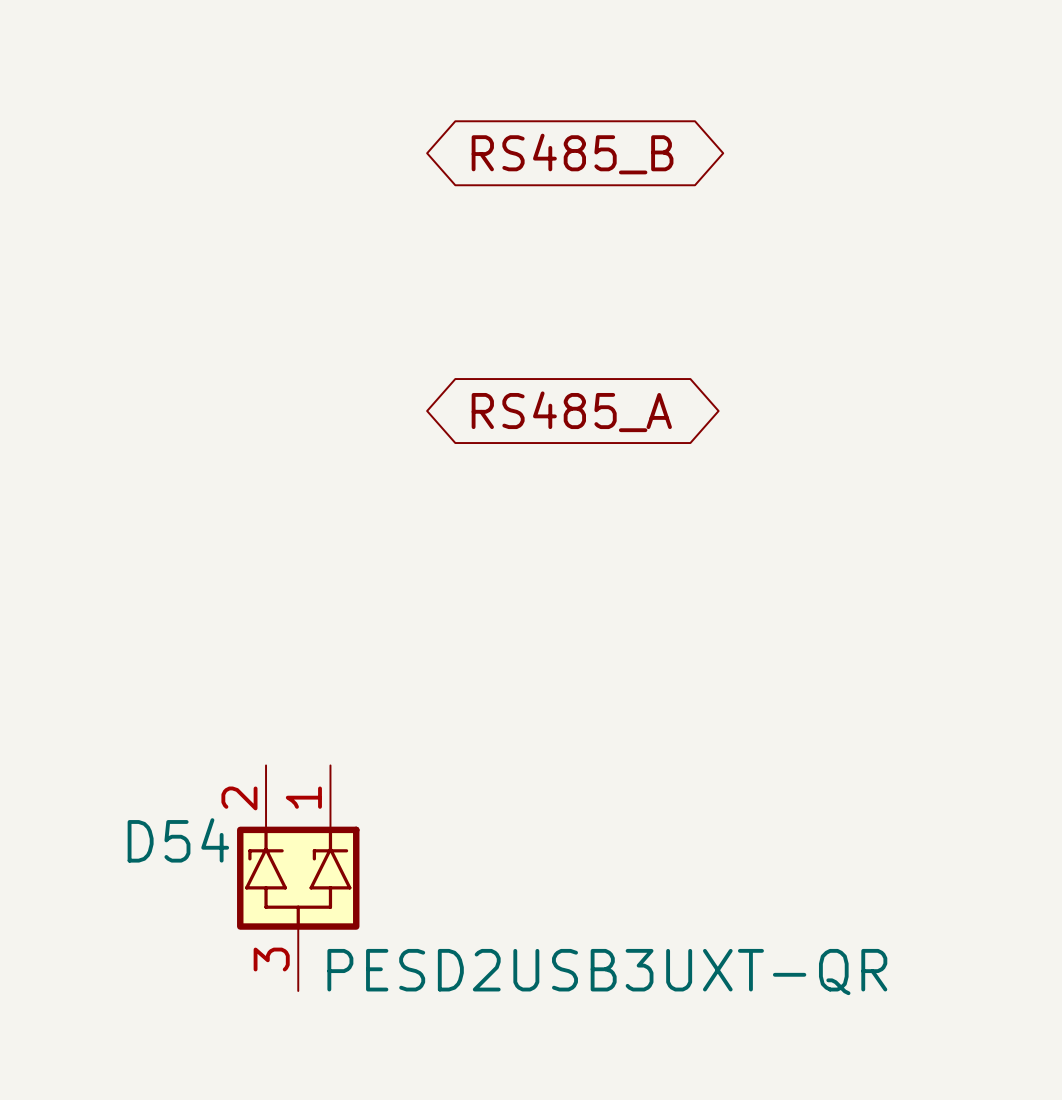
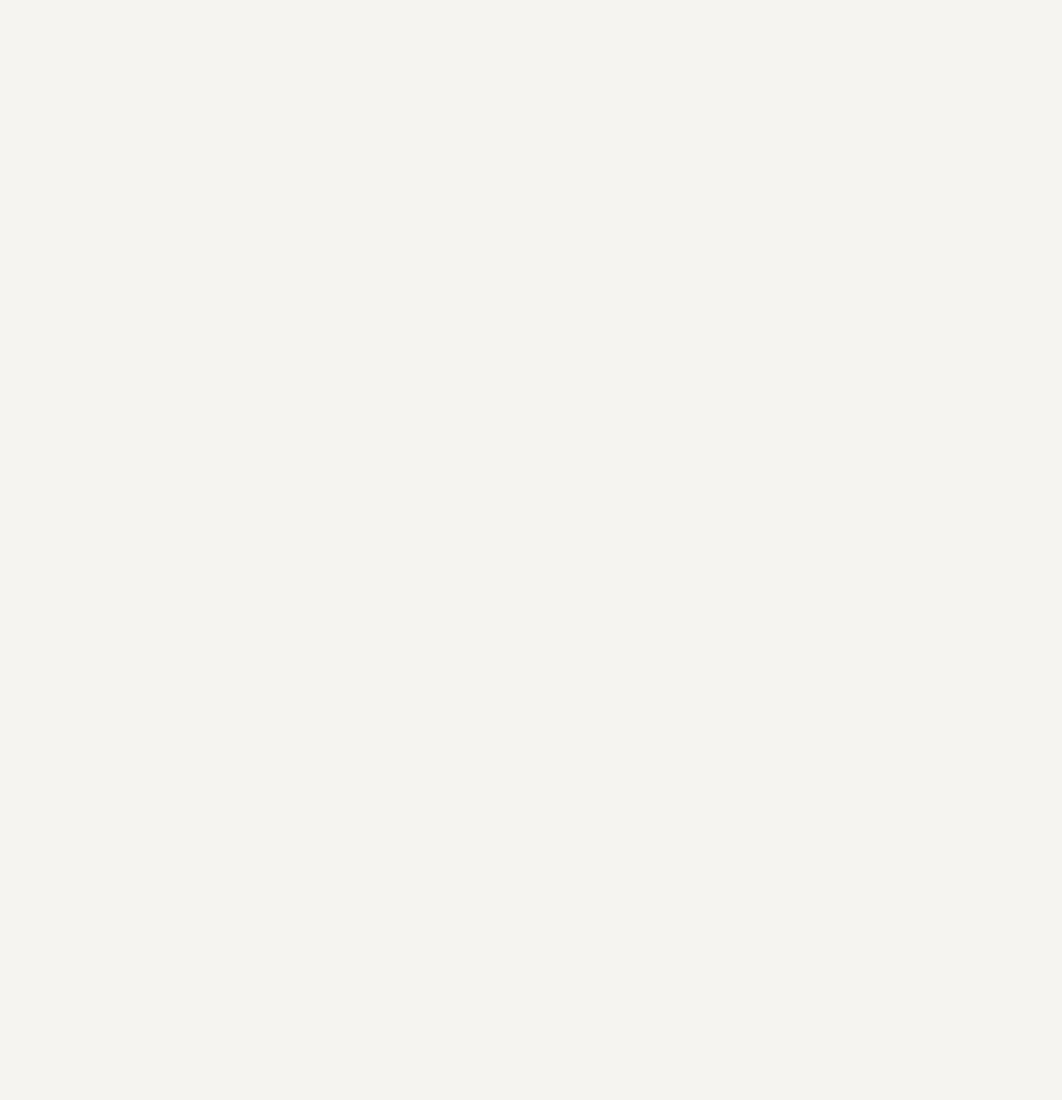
global label: RS485_B (572, 154) -> none
global label: RS485_A (571, 411) -> none
D54: PESD2USB3UXT-QR (298, 878) -> none

